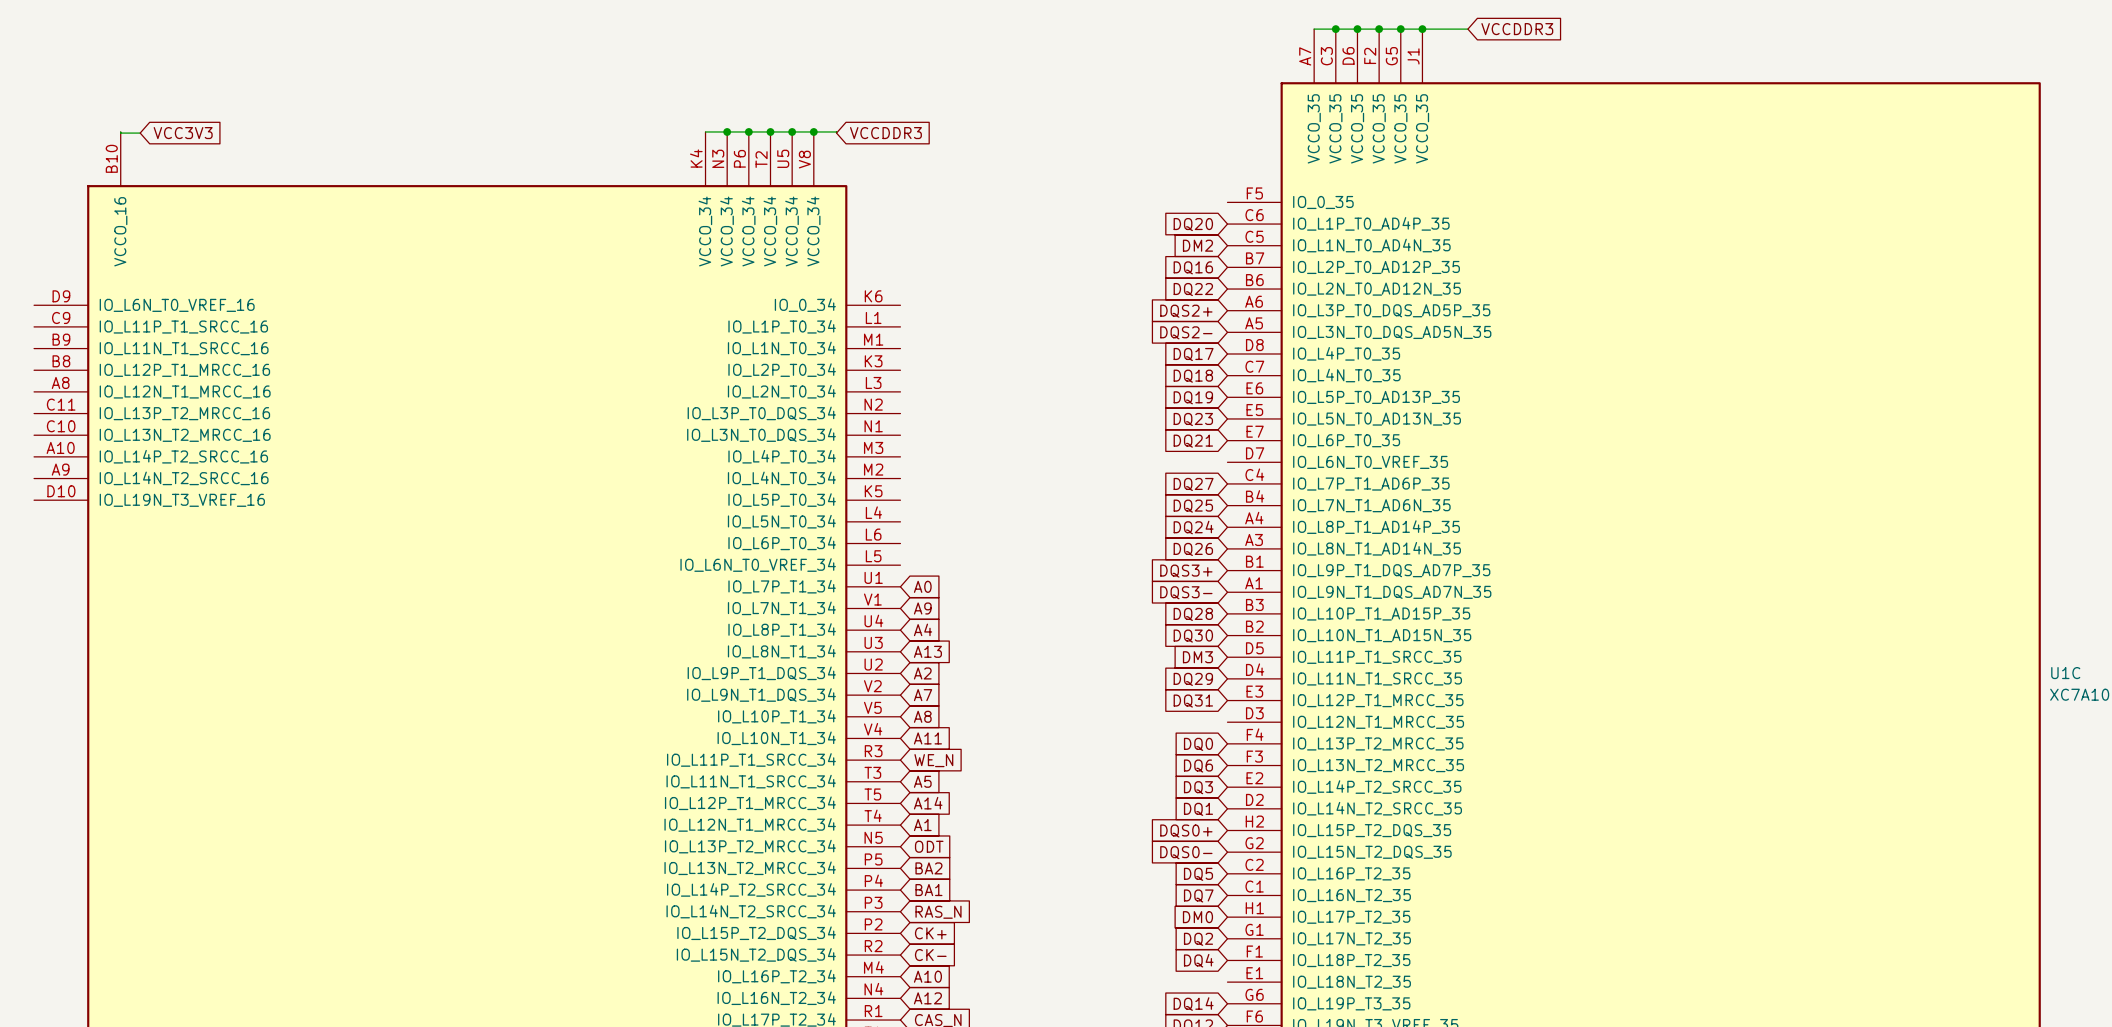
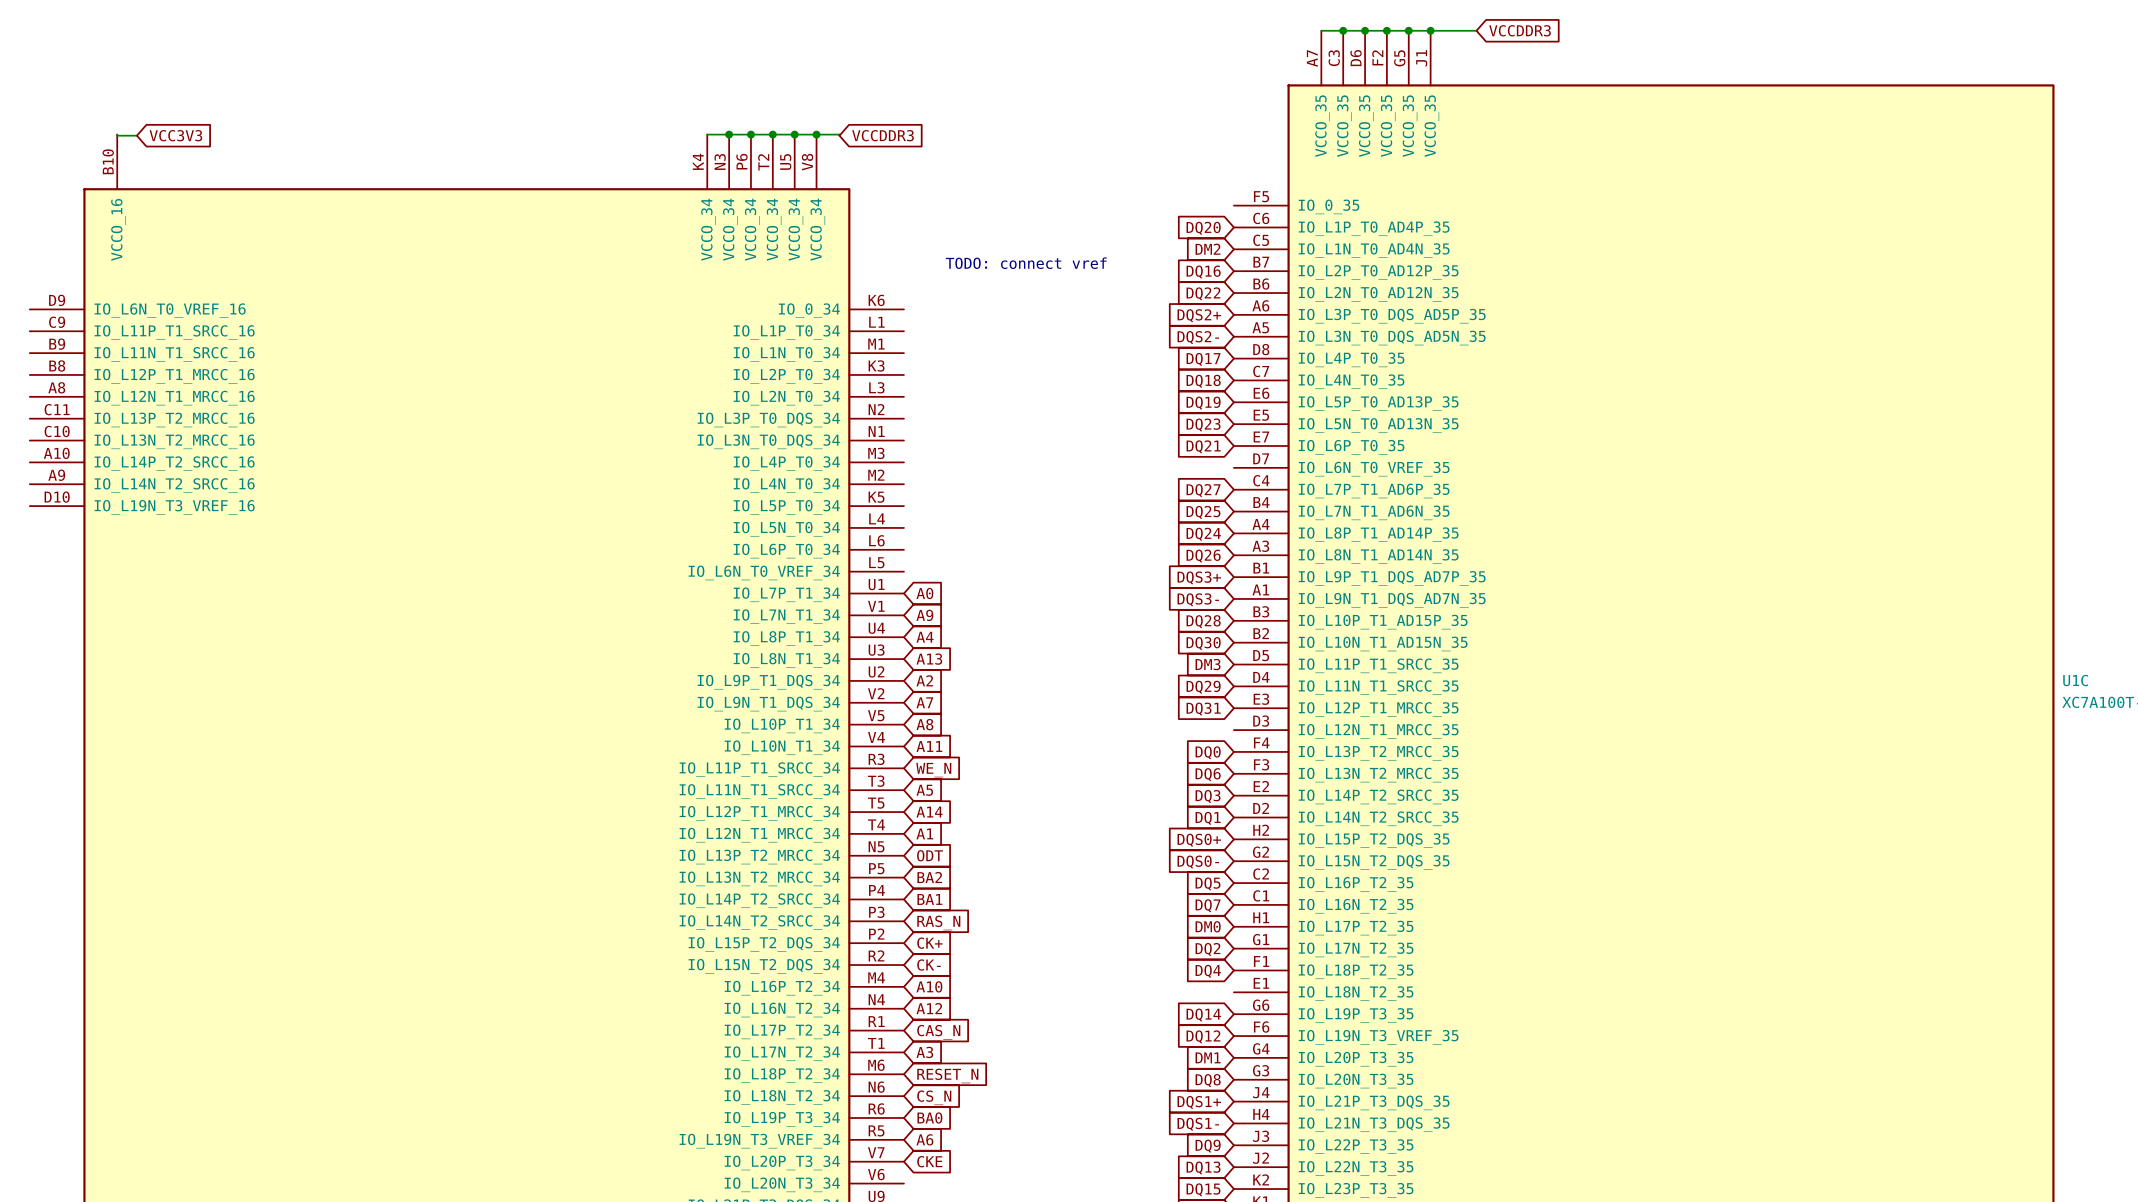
text: none -> TODO: connect vref (1026, 263)

